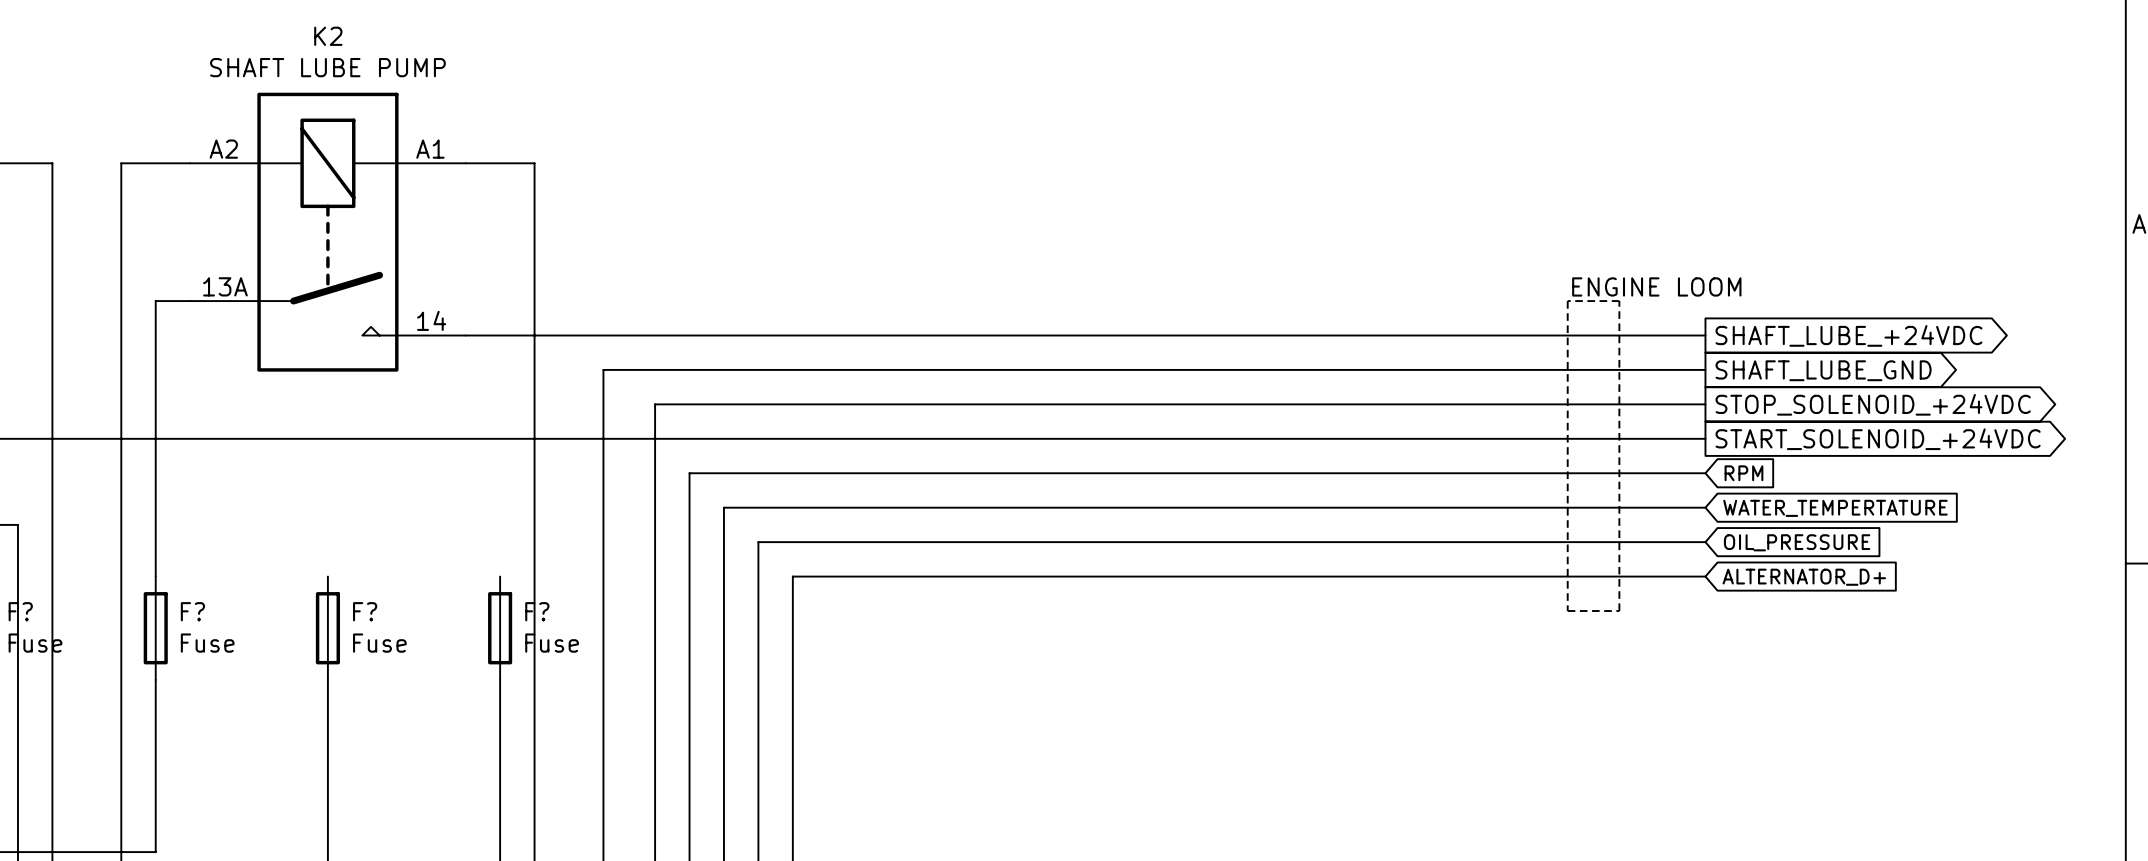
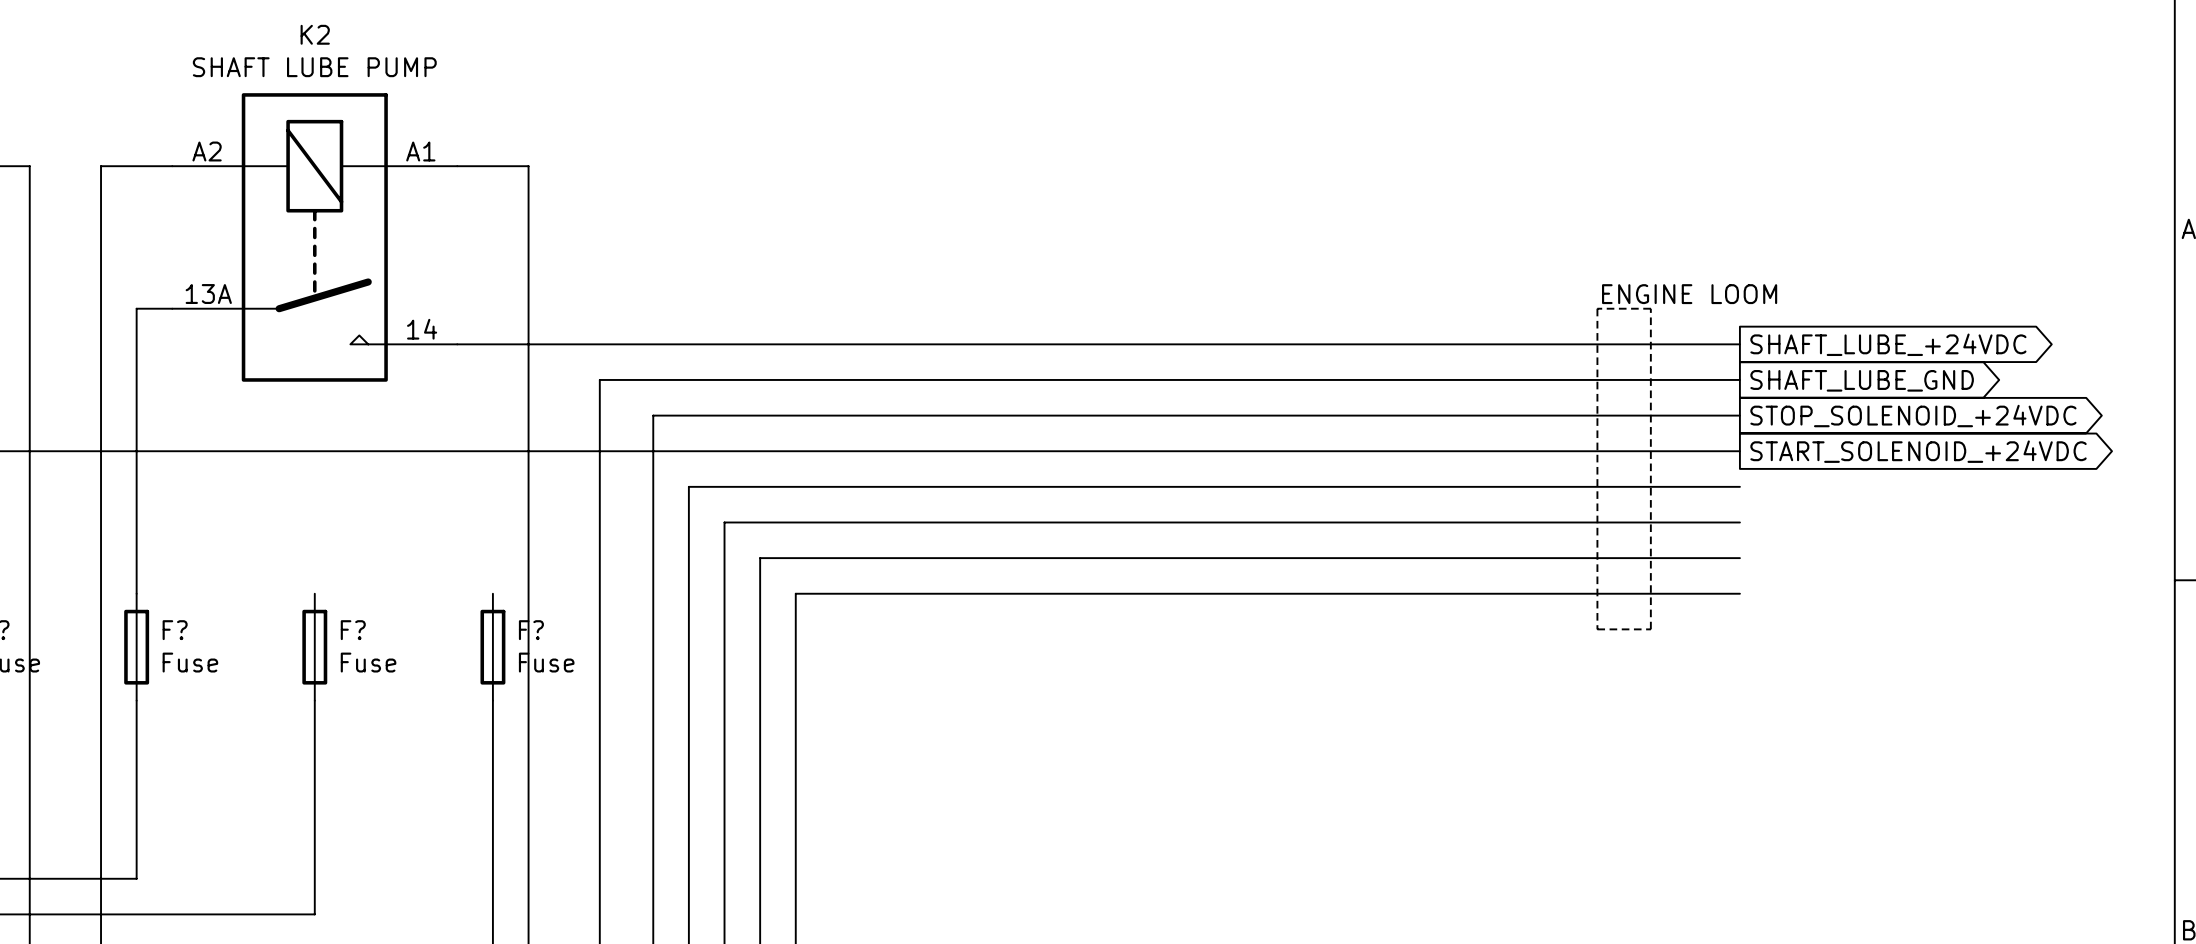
global label: RPM (1743, 473) -> none
global label: WATER_TEMPERTATURE (1835, 508) -> none
global label: OIL_PRESSURE (1797, 542) -> none
global label: ALTERNATOR_D+ (1804, 577) -> none

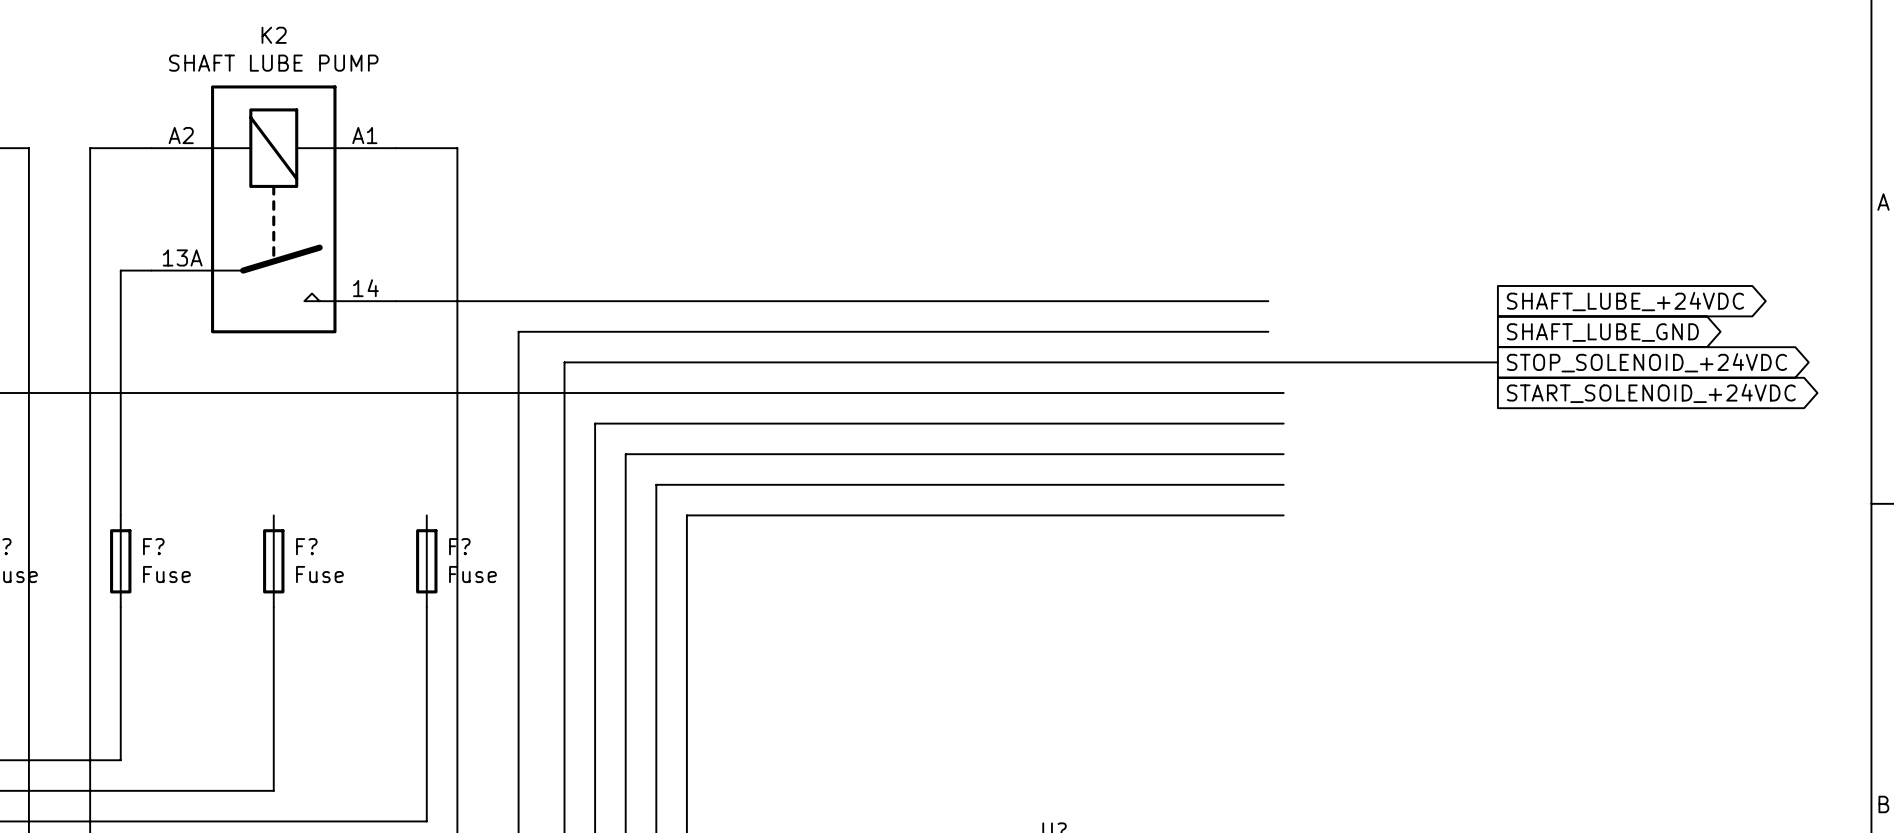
text: ENGINE LOOM (1689, 294) -> none
line: (1597, 308) (1597, 629) (1650, 629) (1650, 308) (1597, 308) -> none
wire: (1472, 344) (1739, 344) -> none
wire: (1472, 379) (1739, 379) -> none
wire: (1490, 451) (1739, 451) -> none
wire: (1490, 486) (1739, 486) -> none
wire: (1490, 522) (1739, 522) -> none
wire: (1490, 558) (1739, 558) -> none
wire: (1490, 593) (1739, 593) -> none

